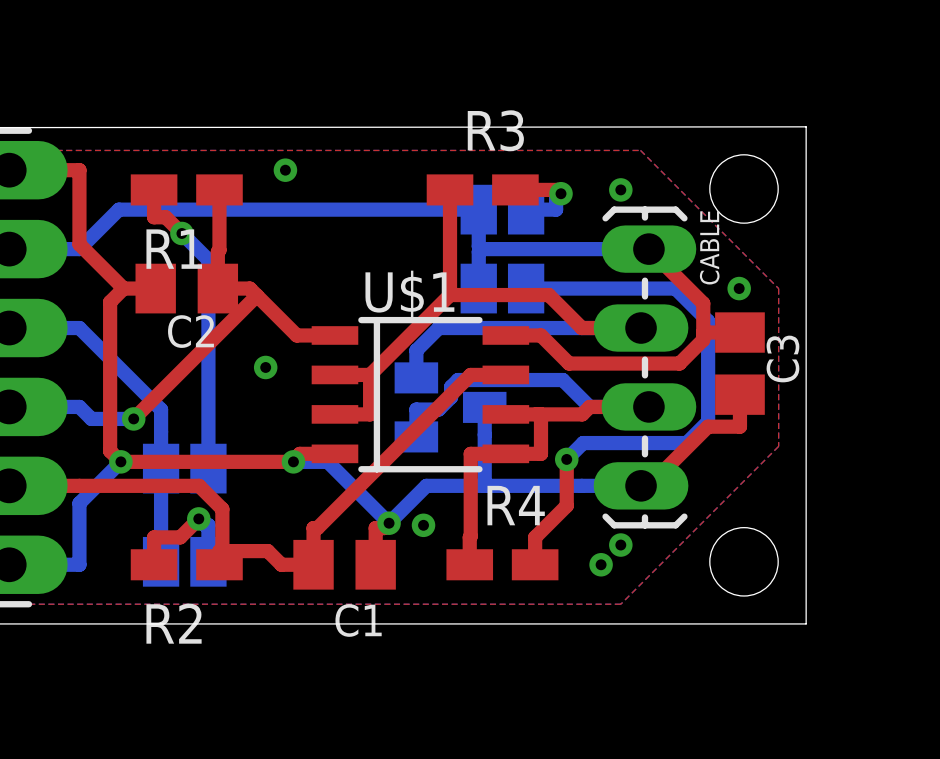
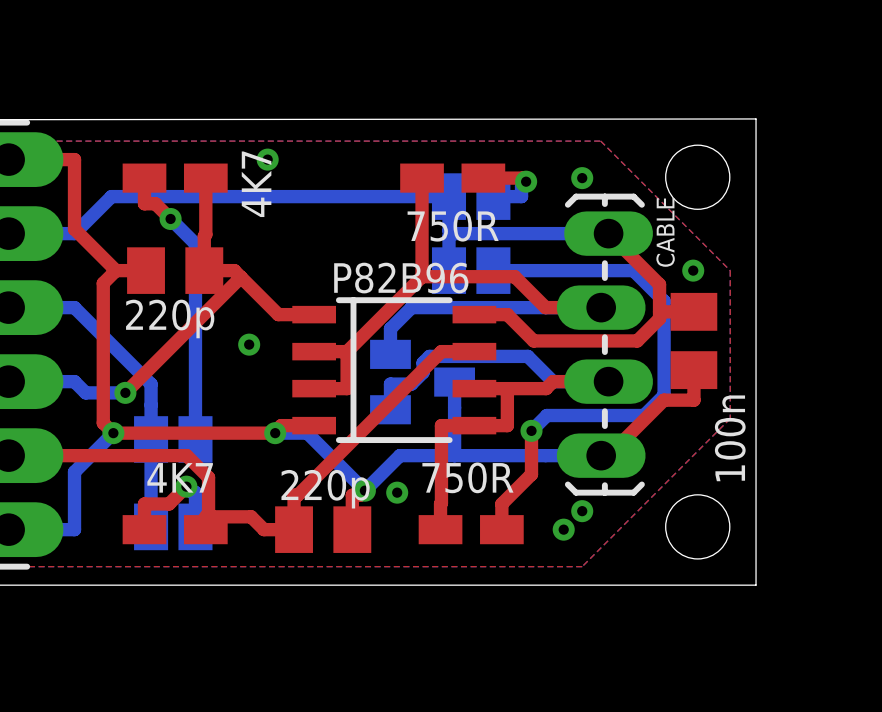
R3 name: R3 (495, 130) -> none
text: none -> 4K7 (256, 184)
text: none -> 750R (453, 226)
R1 name: R1 (174, 249) -> none
U$1 name: U$1 (409, 295) -> none
text: none -> P82B96 (401, 278)
C2 name: C2 (190, 331) -> none
text: none -> 220p (170, 318)
C3 name: C3 (782, 358) -> none
text: none -> 100n (730, 438)
R4 name: R4 (516, 505) -> none
text: none -> 4K7 (180, 477)
text: none -> 750R (467, 477)
text: none -> 220p (325, 489)
C1 name: C1 (358, 620) -> none
R2 name: R2 (174, 623) -> none

